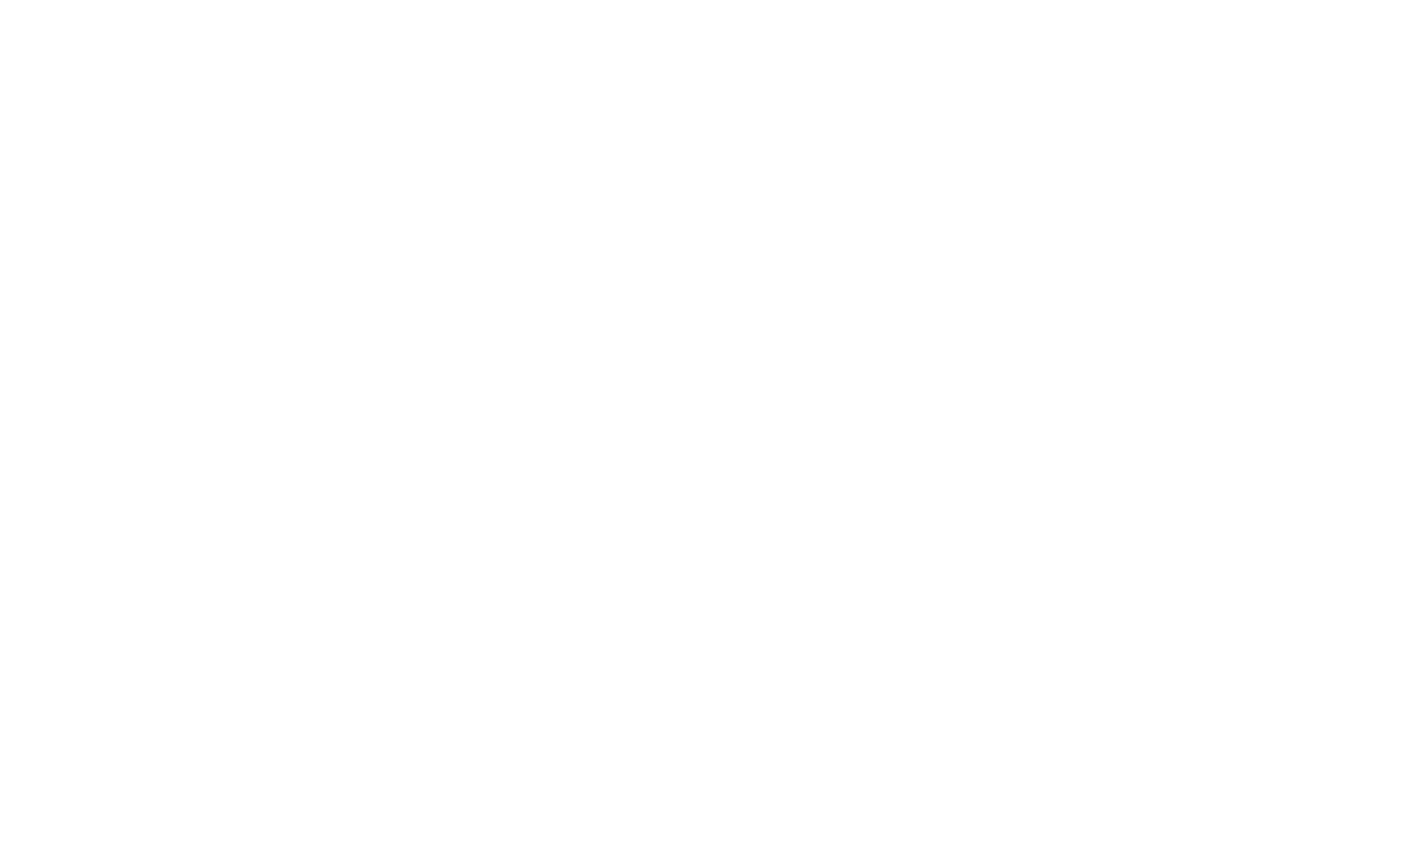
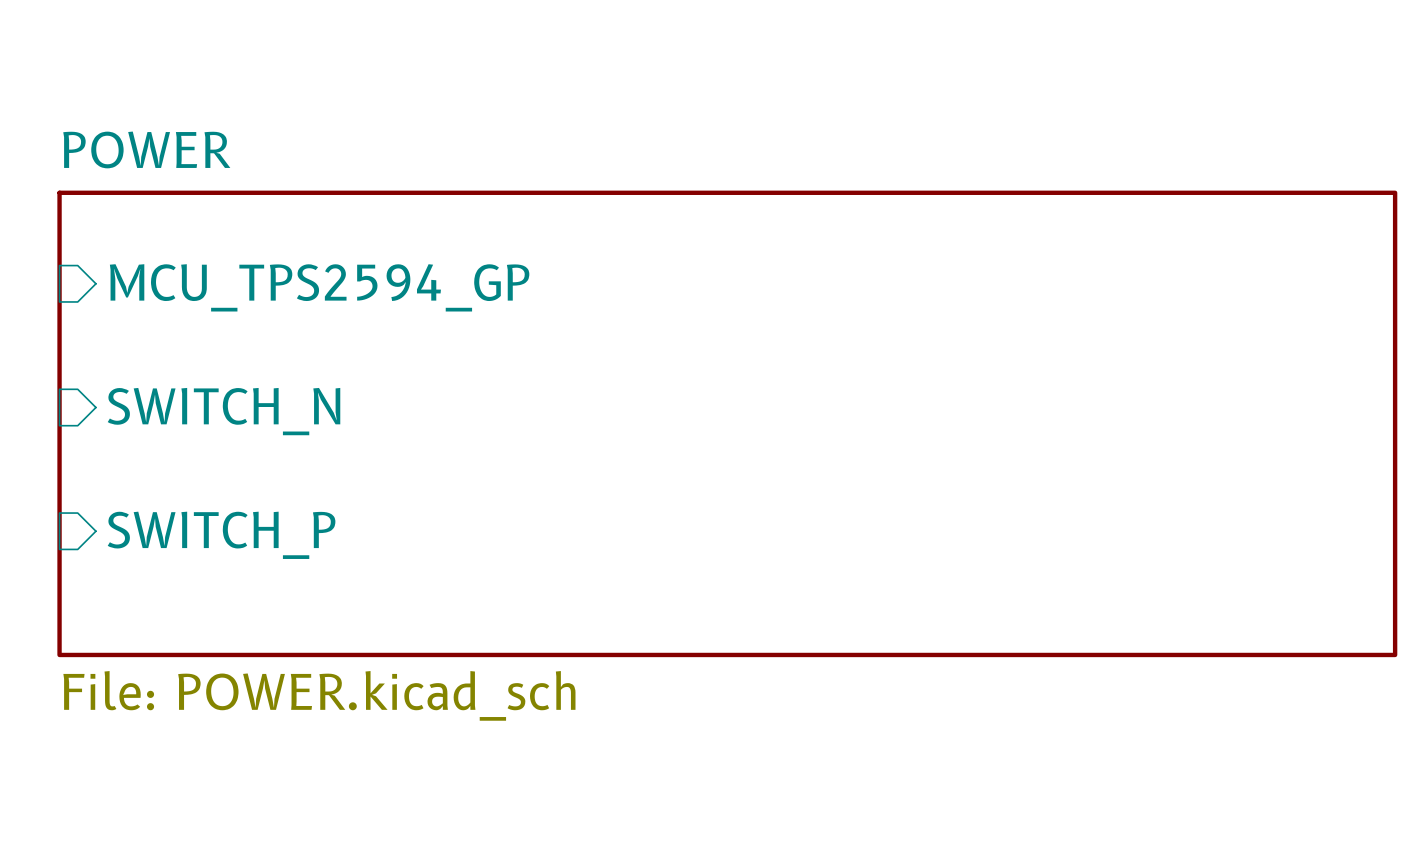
sheet pin: none -> MCU_TPS2594_GP (319, 287)
sheet pin: none -> SWITCH_N (223, 411)
sheet POWER: none -> File: POWER.kicad_sch (727, 423)
sheet pin: none -> SWITCH_P (221, 535)

